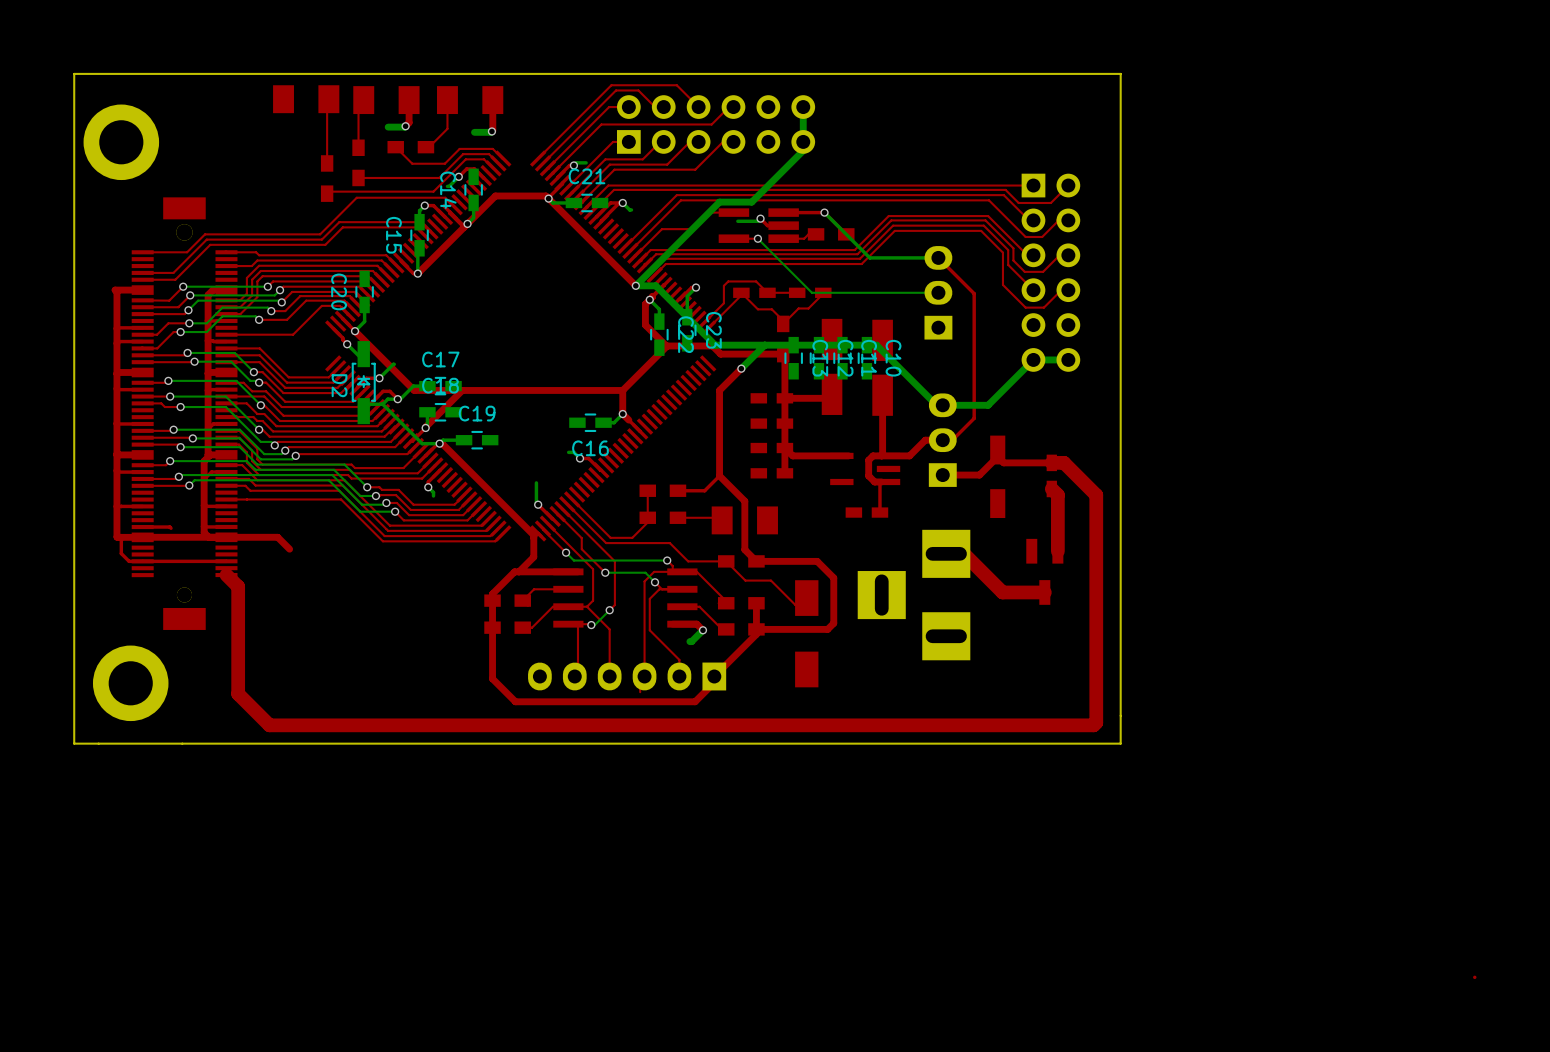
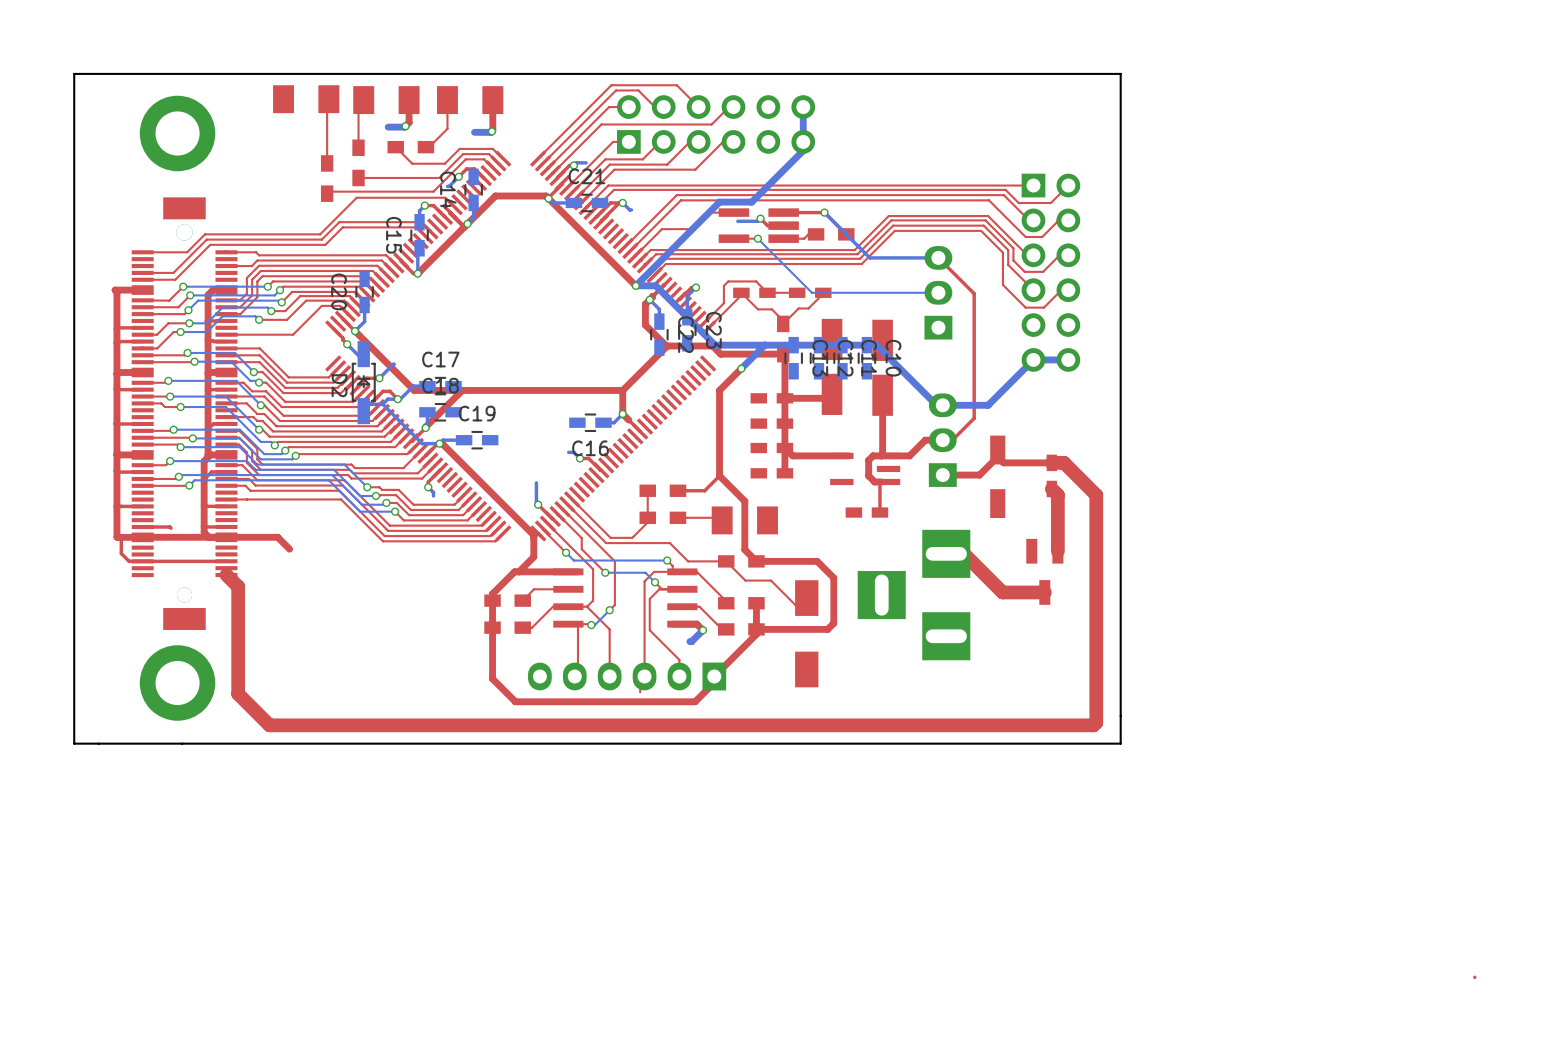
part position: (121, 142) -> (177, 133)
part position: (130, 683) -> (177, 682)

